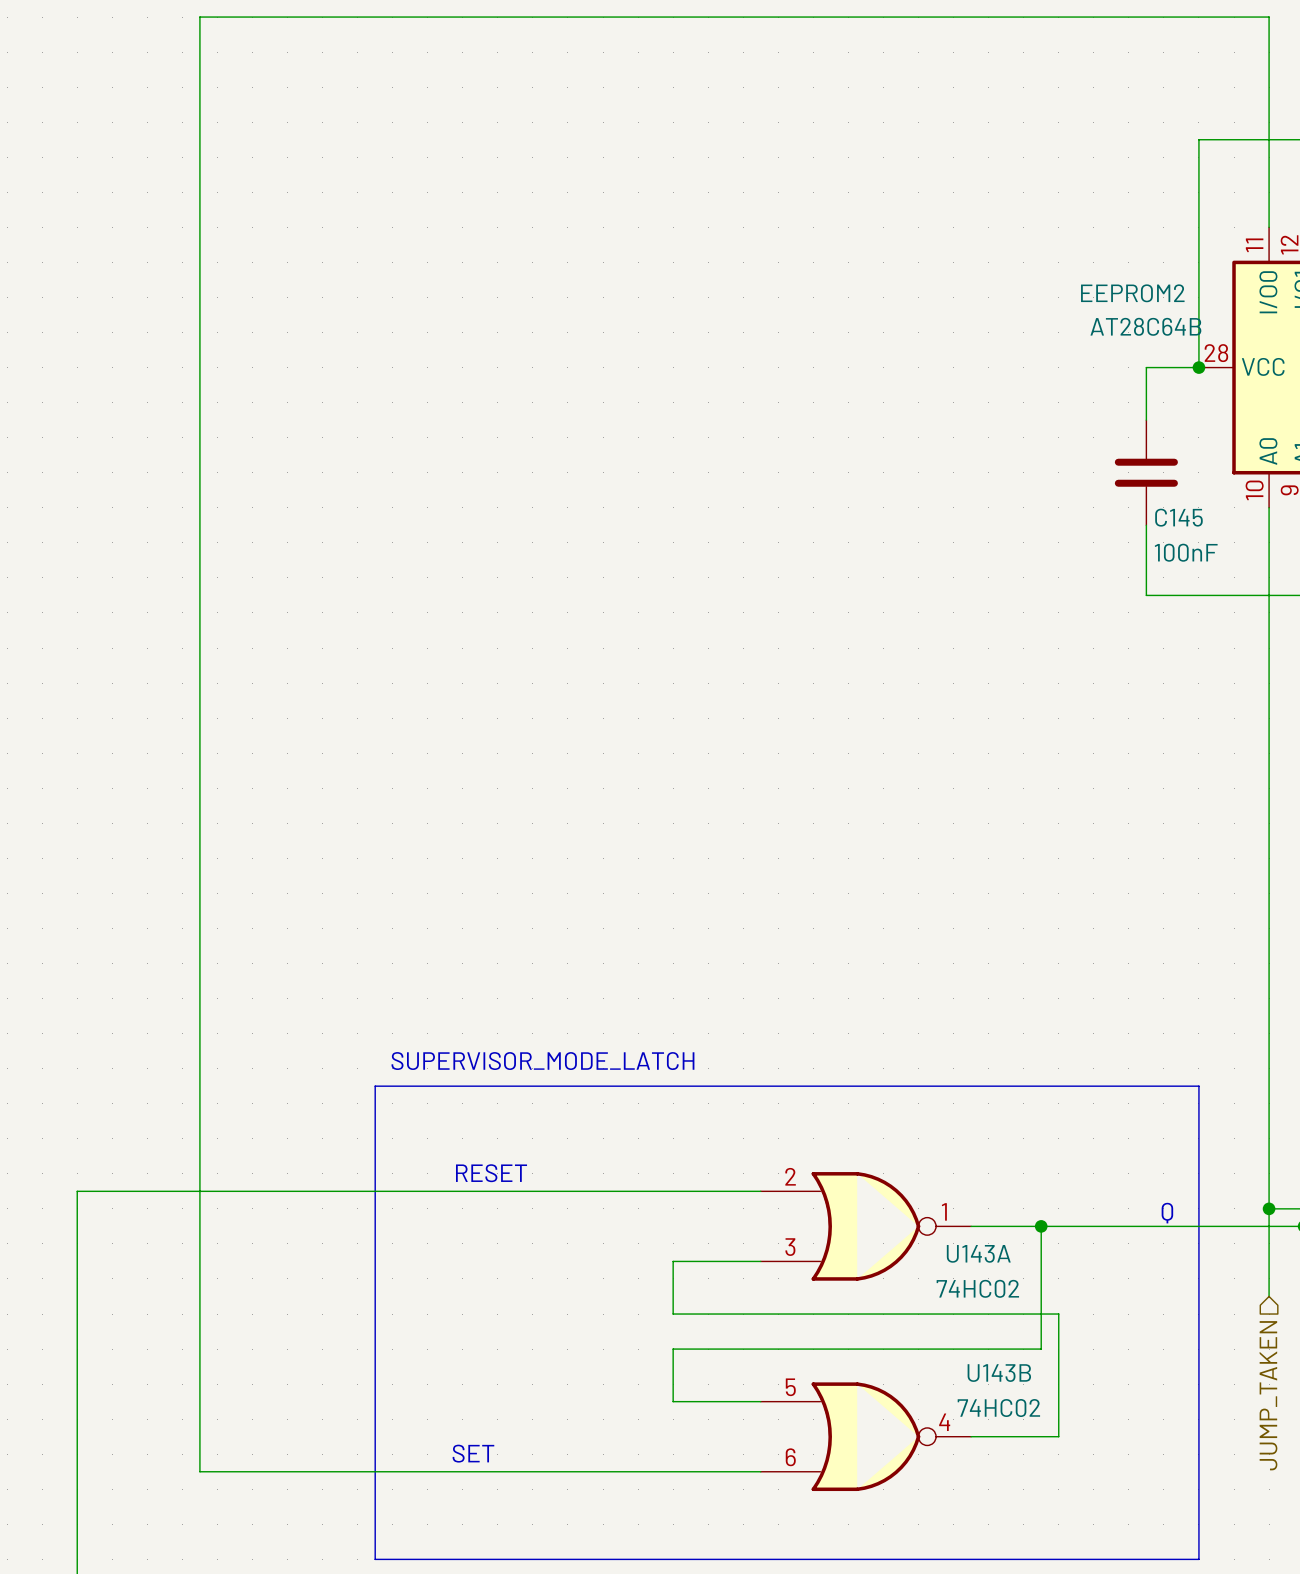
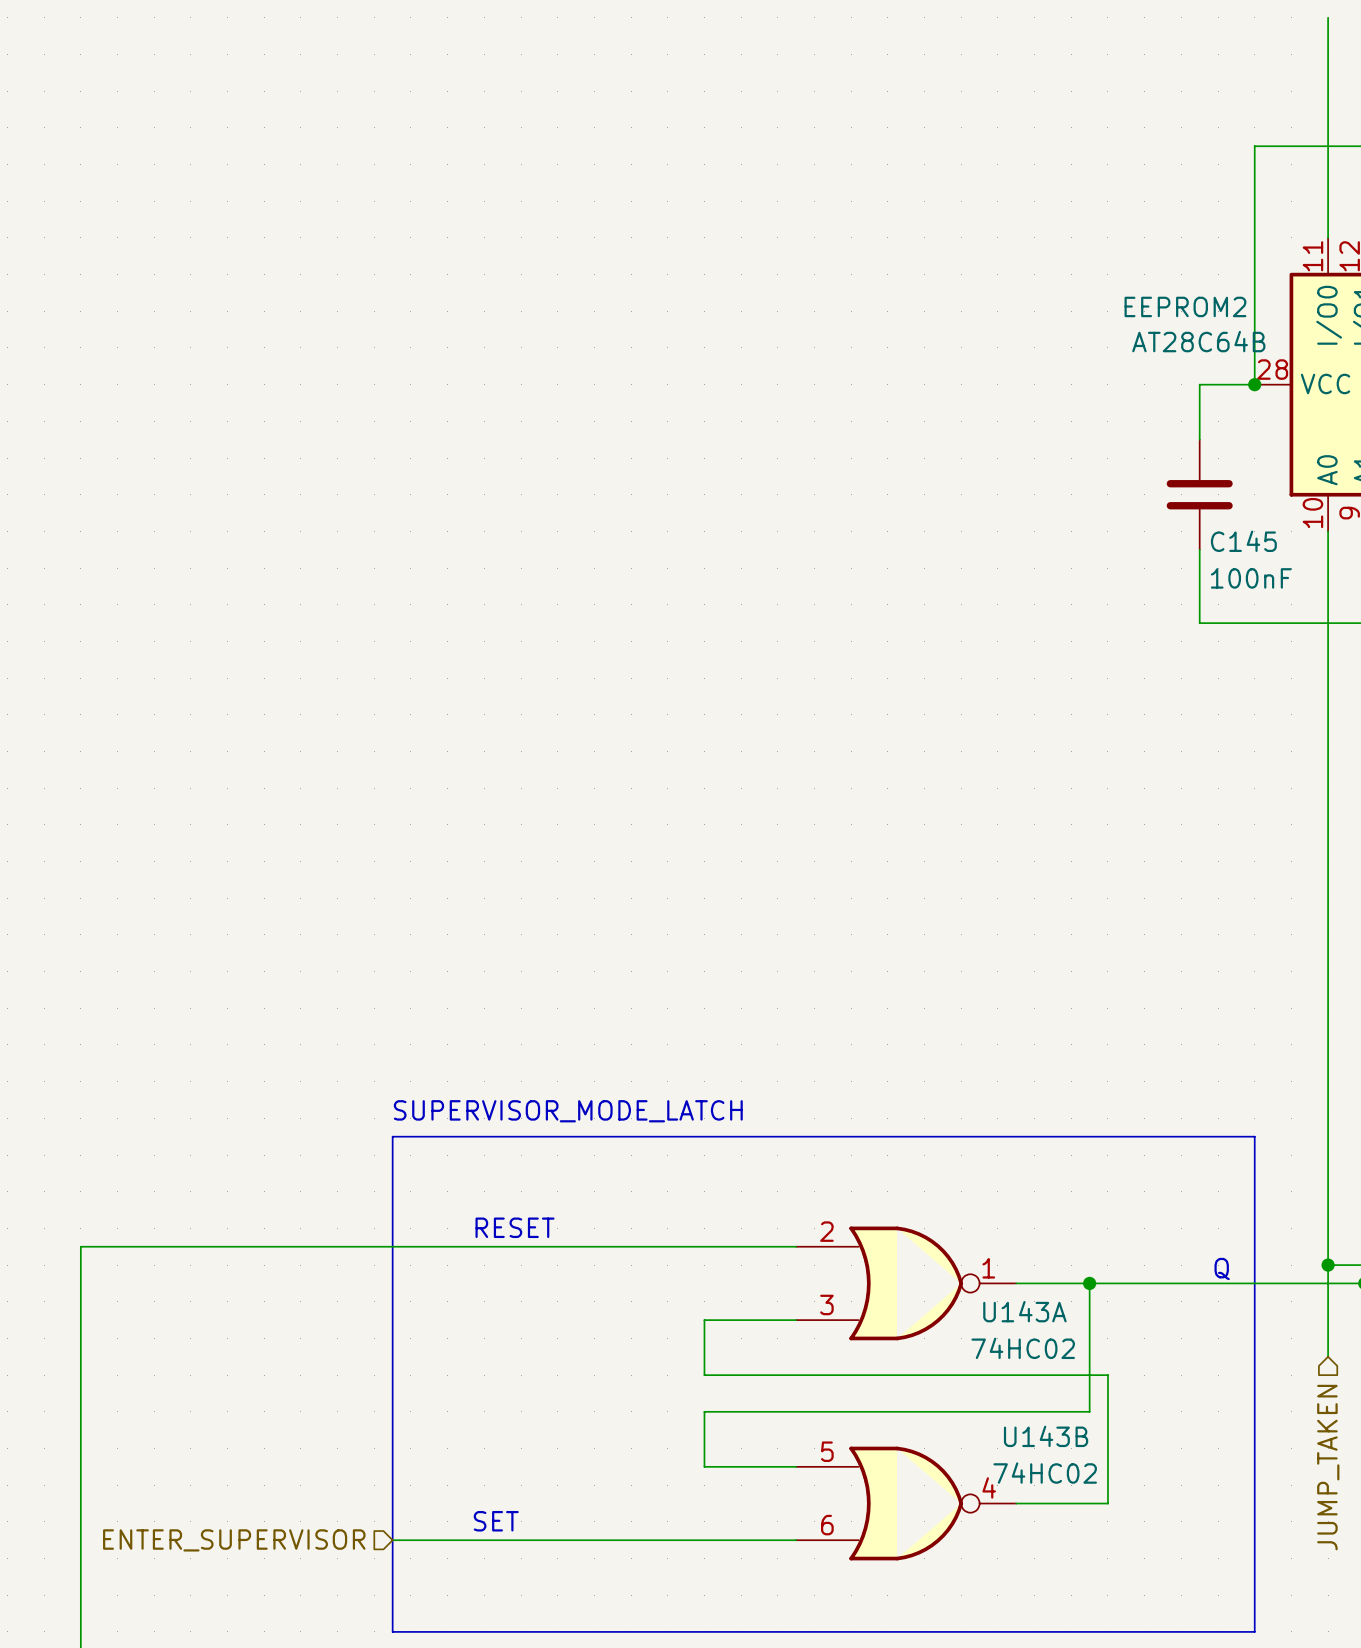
wire: (1269, 17) (199, 17) (199, 1471) (375, 1471) -> none
hierarchical label: none -> ENTER_SUPERVISOR (234, 1540)

